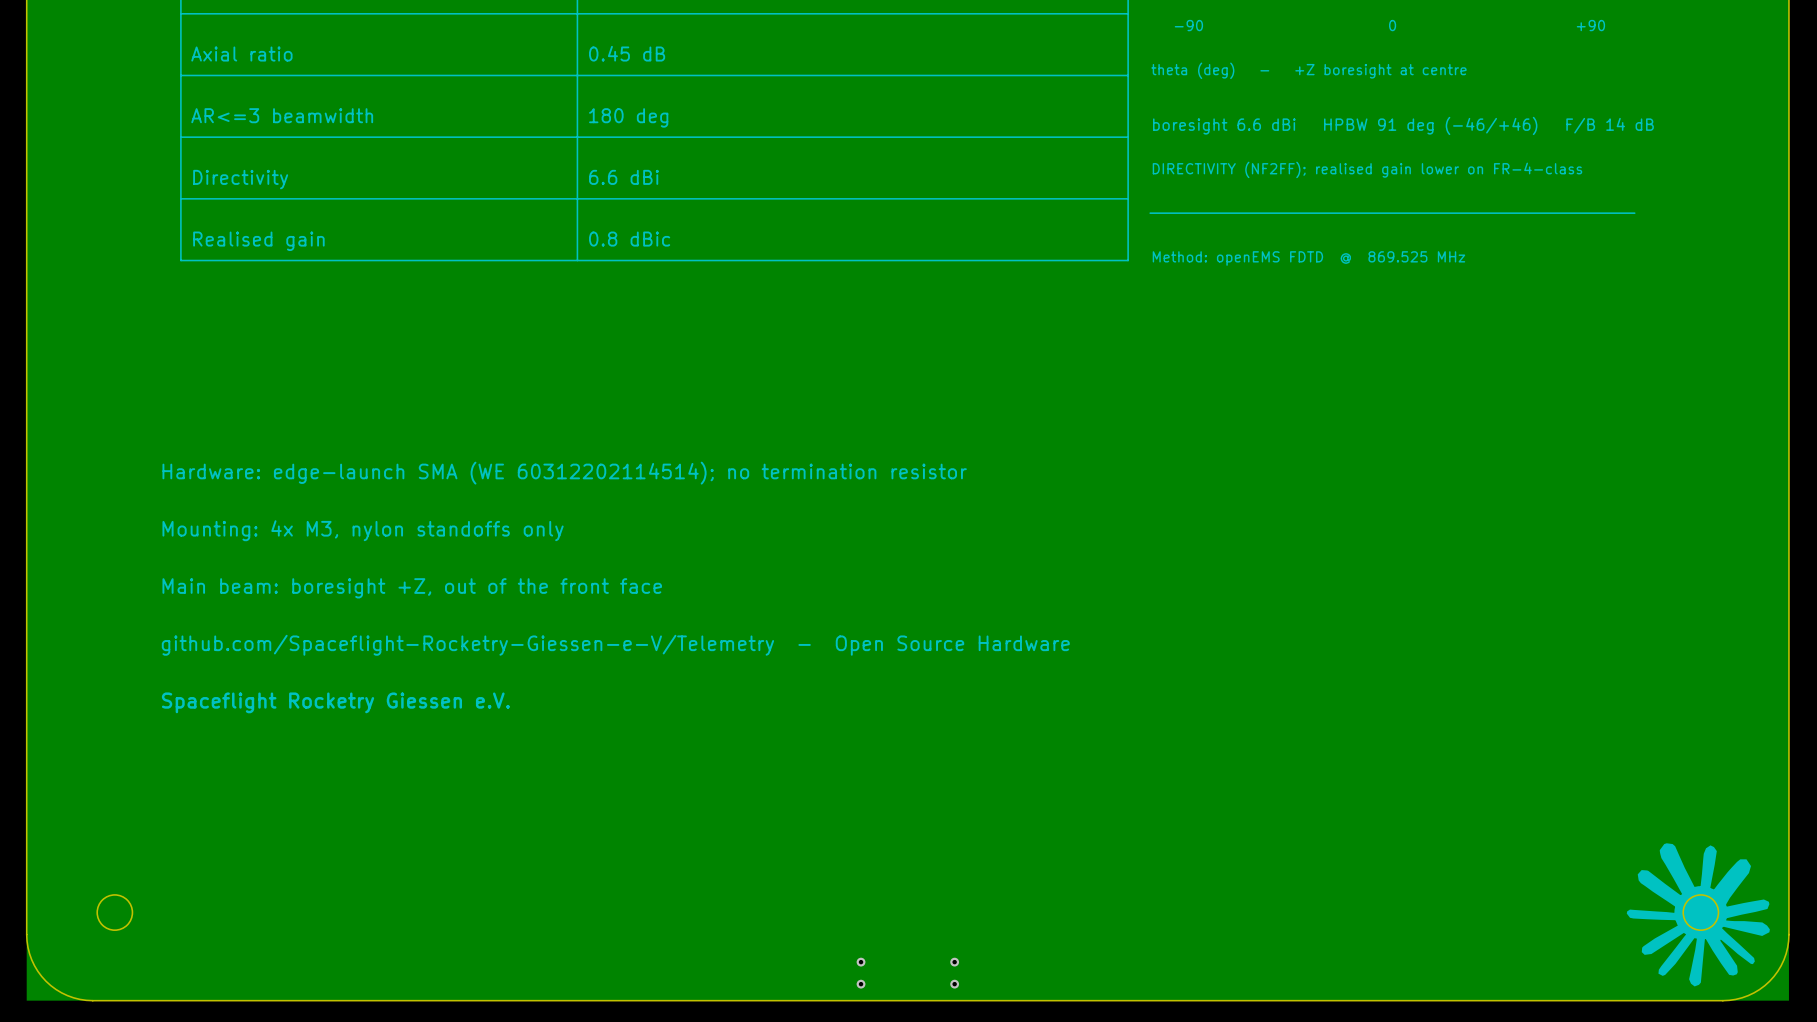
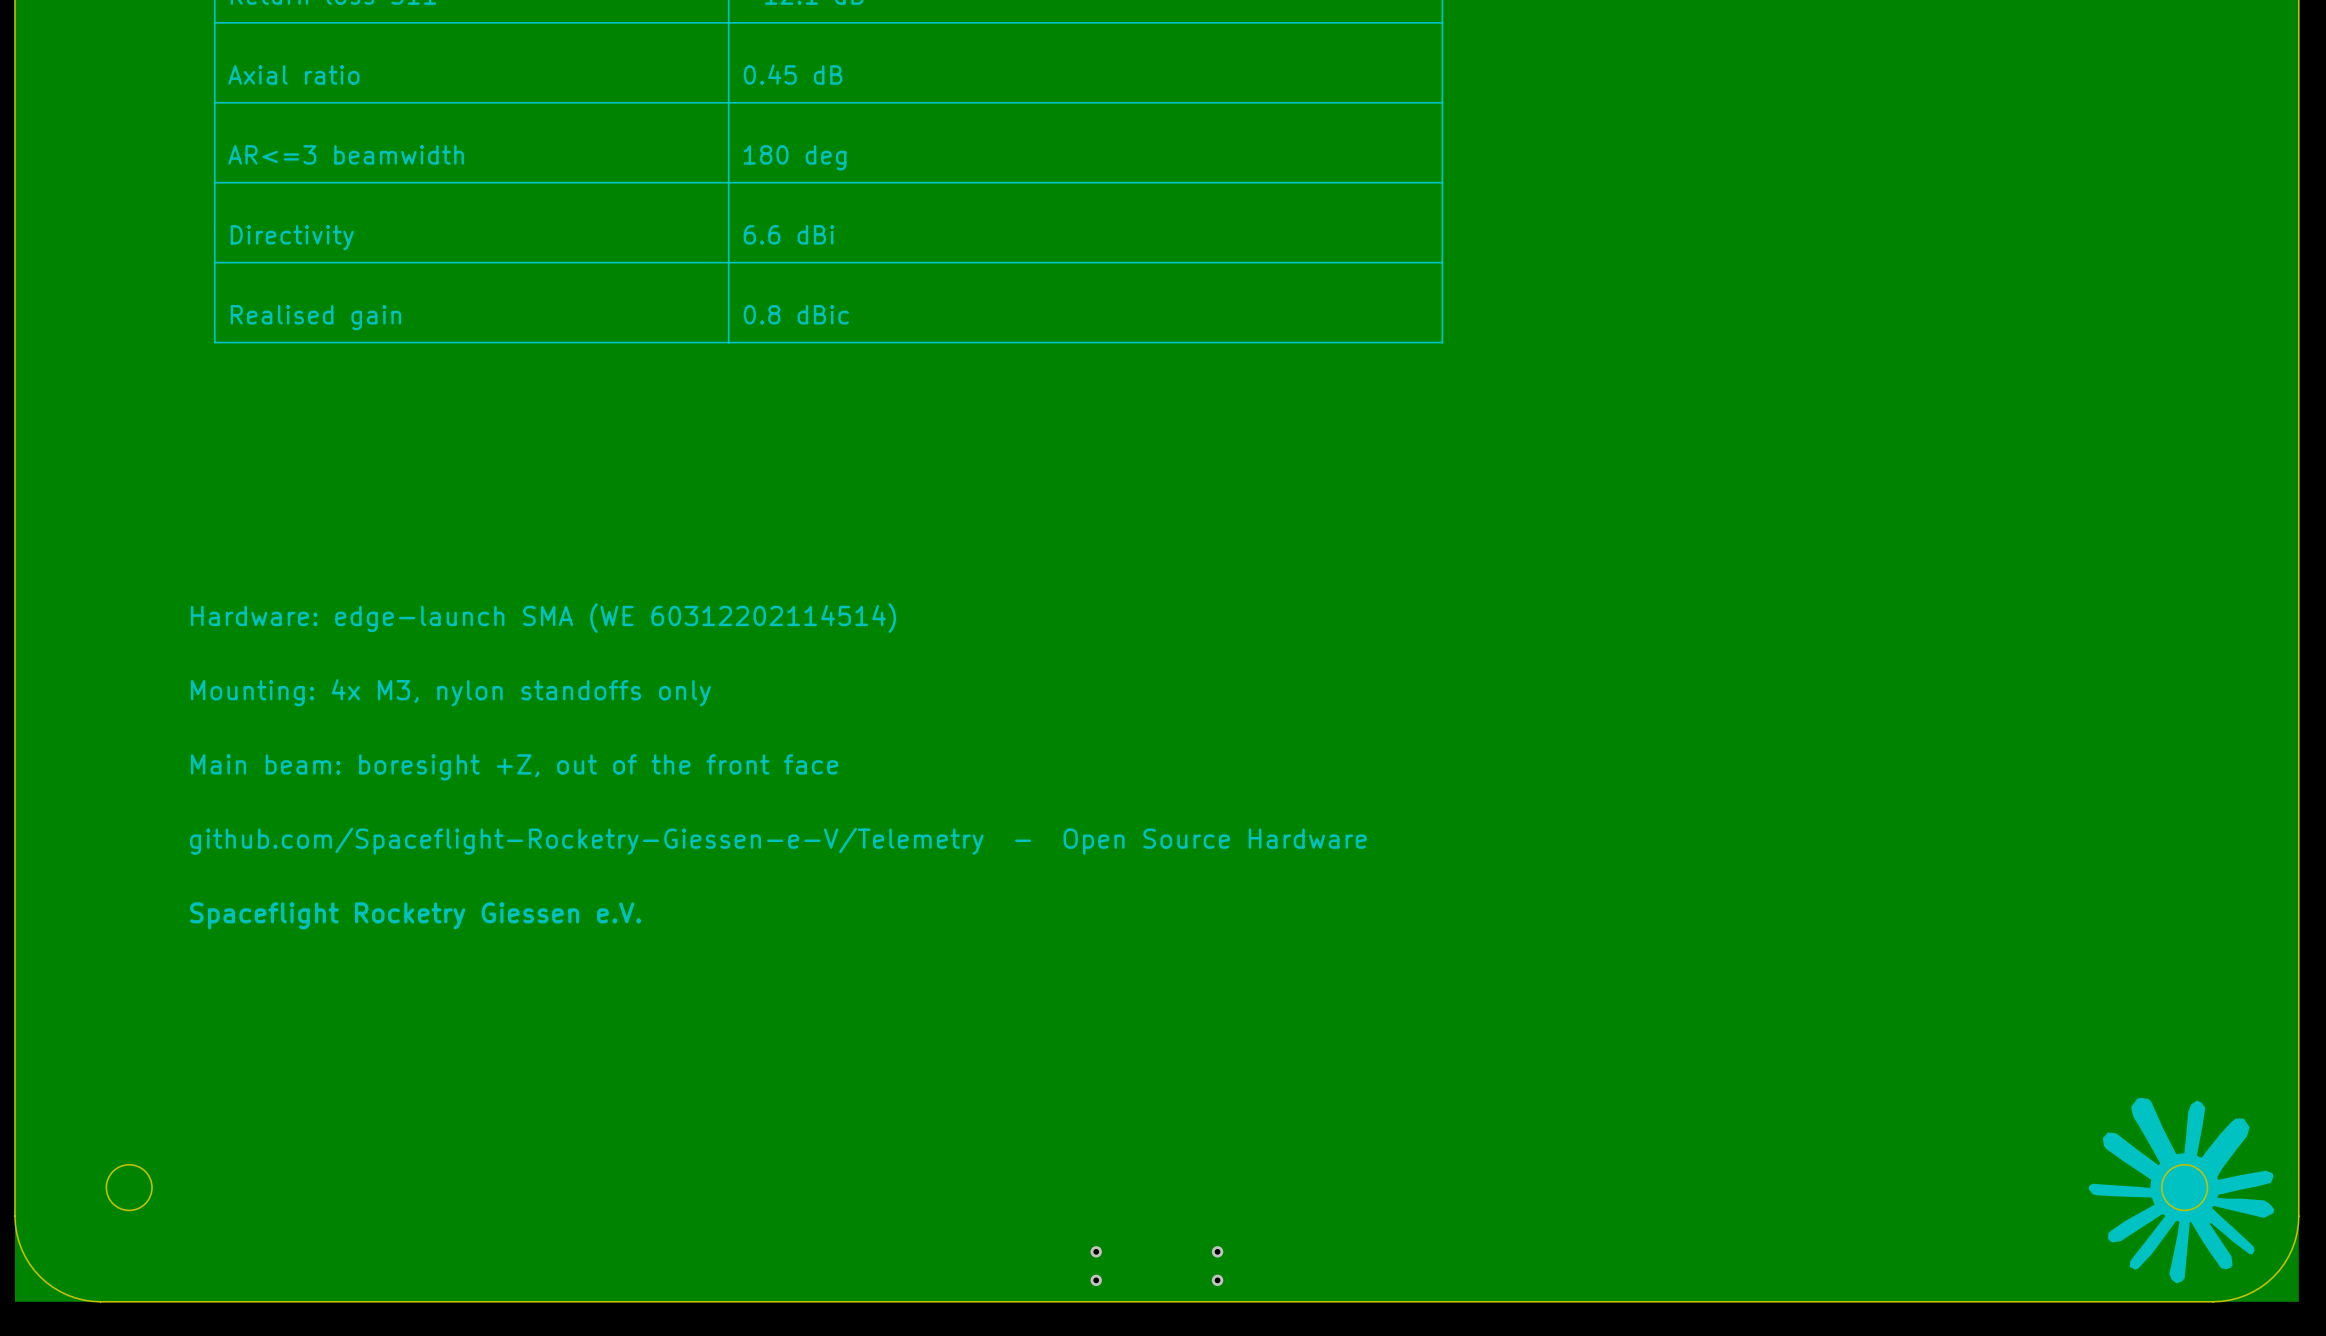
text: -90 (1188, 25) -> none
text: 0 (1392, 25) -> none
text: +90 (1590, 25) -> none
text: theta (deg) - +Z boresight at centre (1308, 70) -> none
text: boresight 6.6 dBi HPBW 91 deg (-46/+46) F/B 14 dB (1403, 125) -> none
text: DIRECTIVITY (NF2FF); realised gain lower on FR-4-class (1367, 169) -> none
line: (1634, 213) (1150, 213) -> none
text: Method: openEMS FDTD @ 869.525 MHz (1308, 258) -> none
text: Hardware: edge-launch SMA (WE 60312202114514); no termination resistor (564, 473) -> Hardware: edge-launch SMA (WE 60312202114514) (543, 618)

